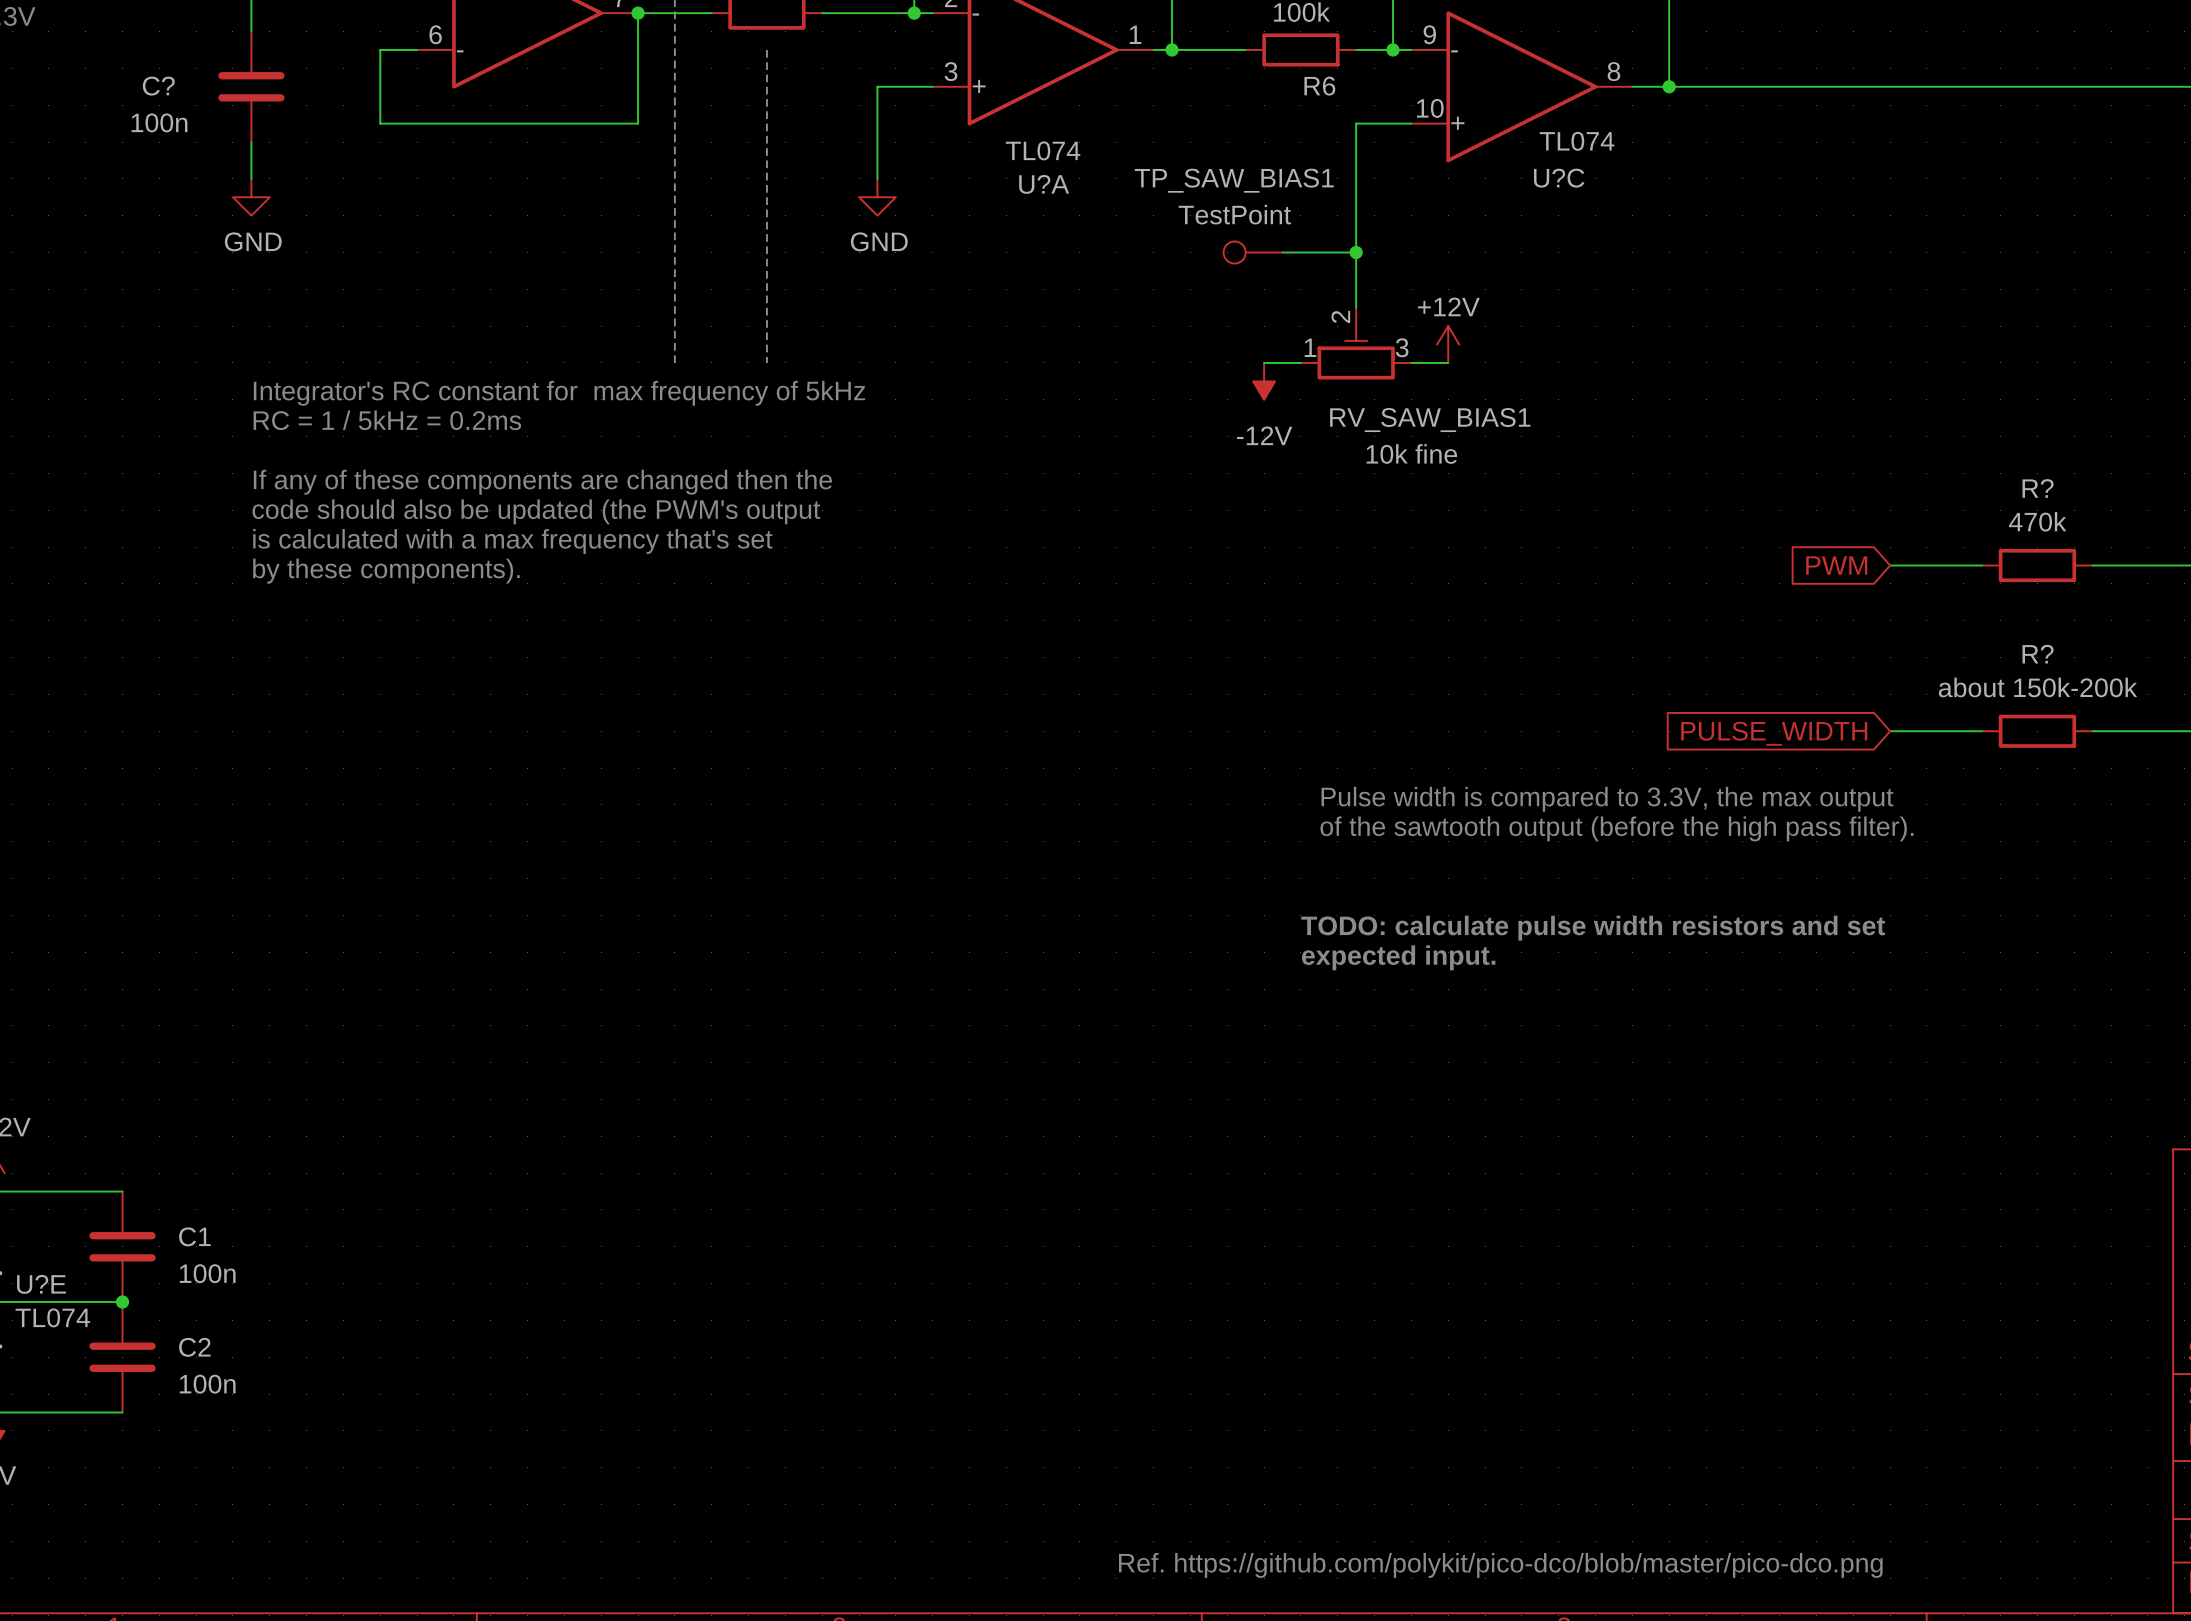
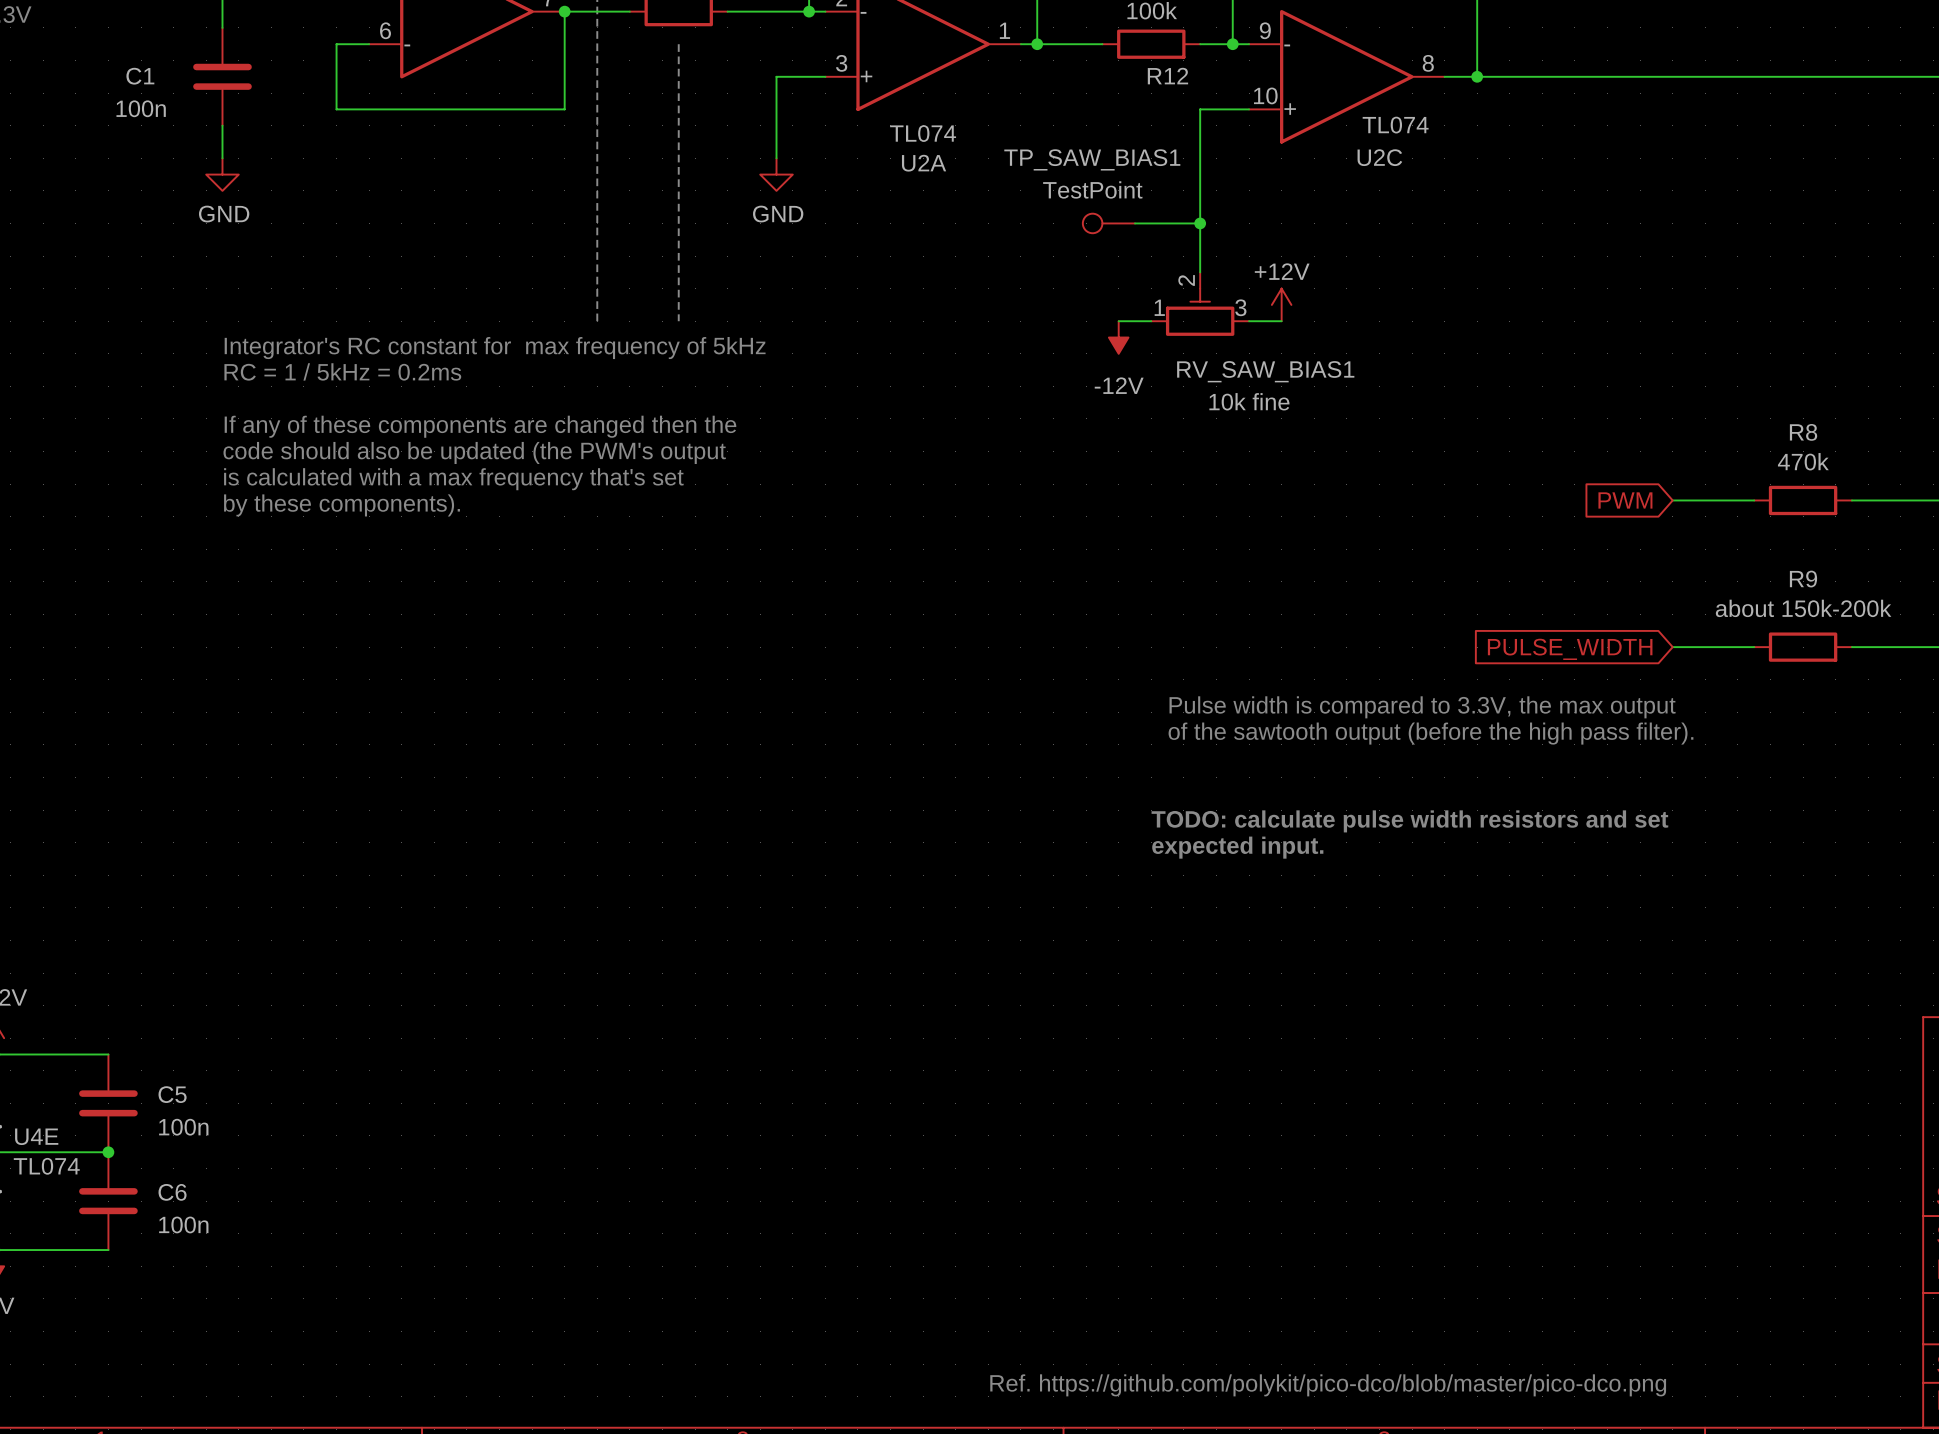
C? name: C? (158, 86) -> C1 (140, 76)
R6 name: R6 (1319, 86) -> R12 (1167, 76)
U?C name: U?C (1559, 178) -> U2C (1379, 157)
U?A name: U?A (1044, 184) -> U2A (924, 163)
R? name: R? (2038, 488) -> R8 (1803, 432)
R? name: R? (2038, 654) -> R9 (1803, 579)
C1 name: C1 (194, 1236) -> C5 (172, 1094)
U?E name: U?E (41, 1284) -> U4E (36, 1136)
C2 name: C2 (194, 1347) -> C6 (172, 1192)

